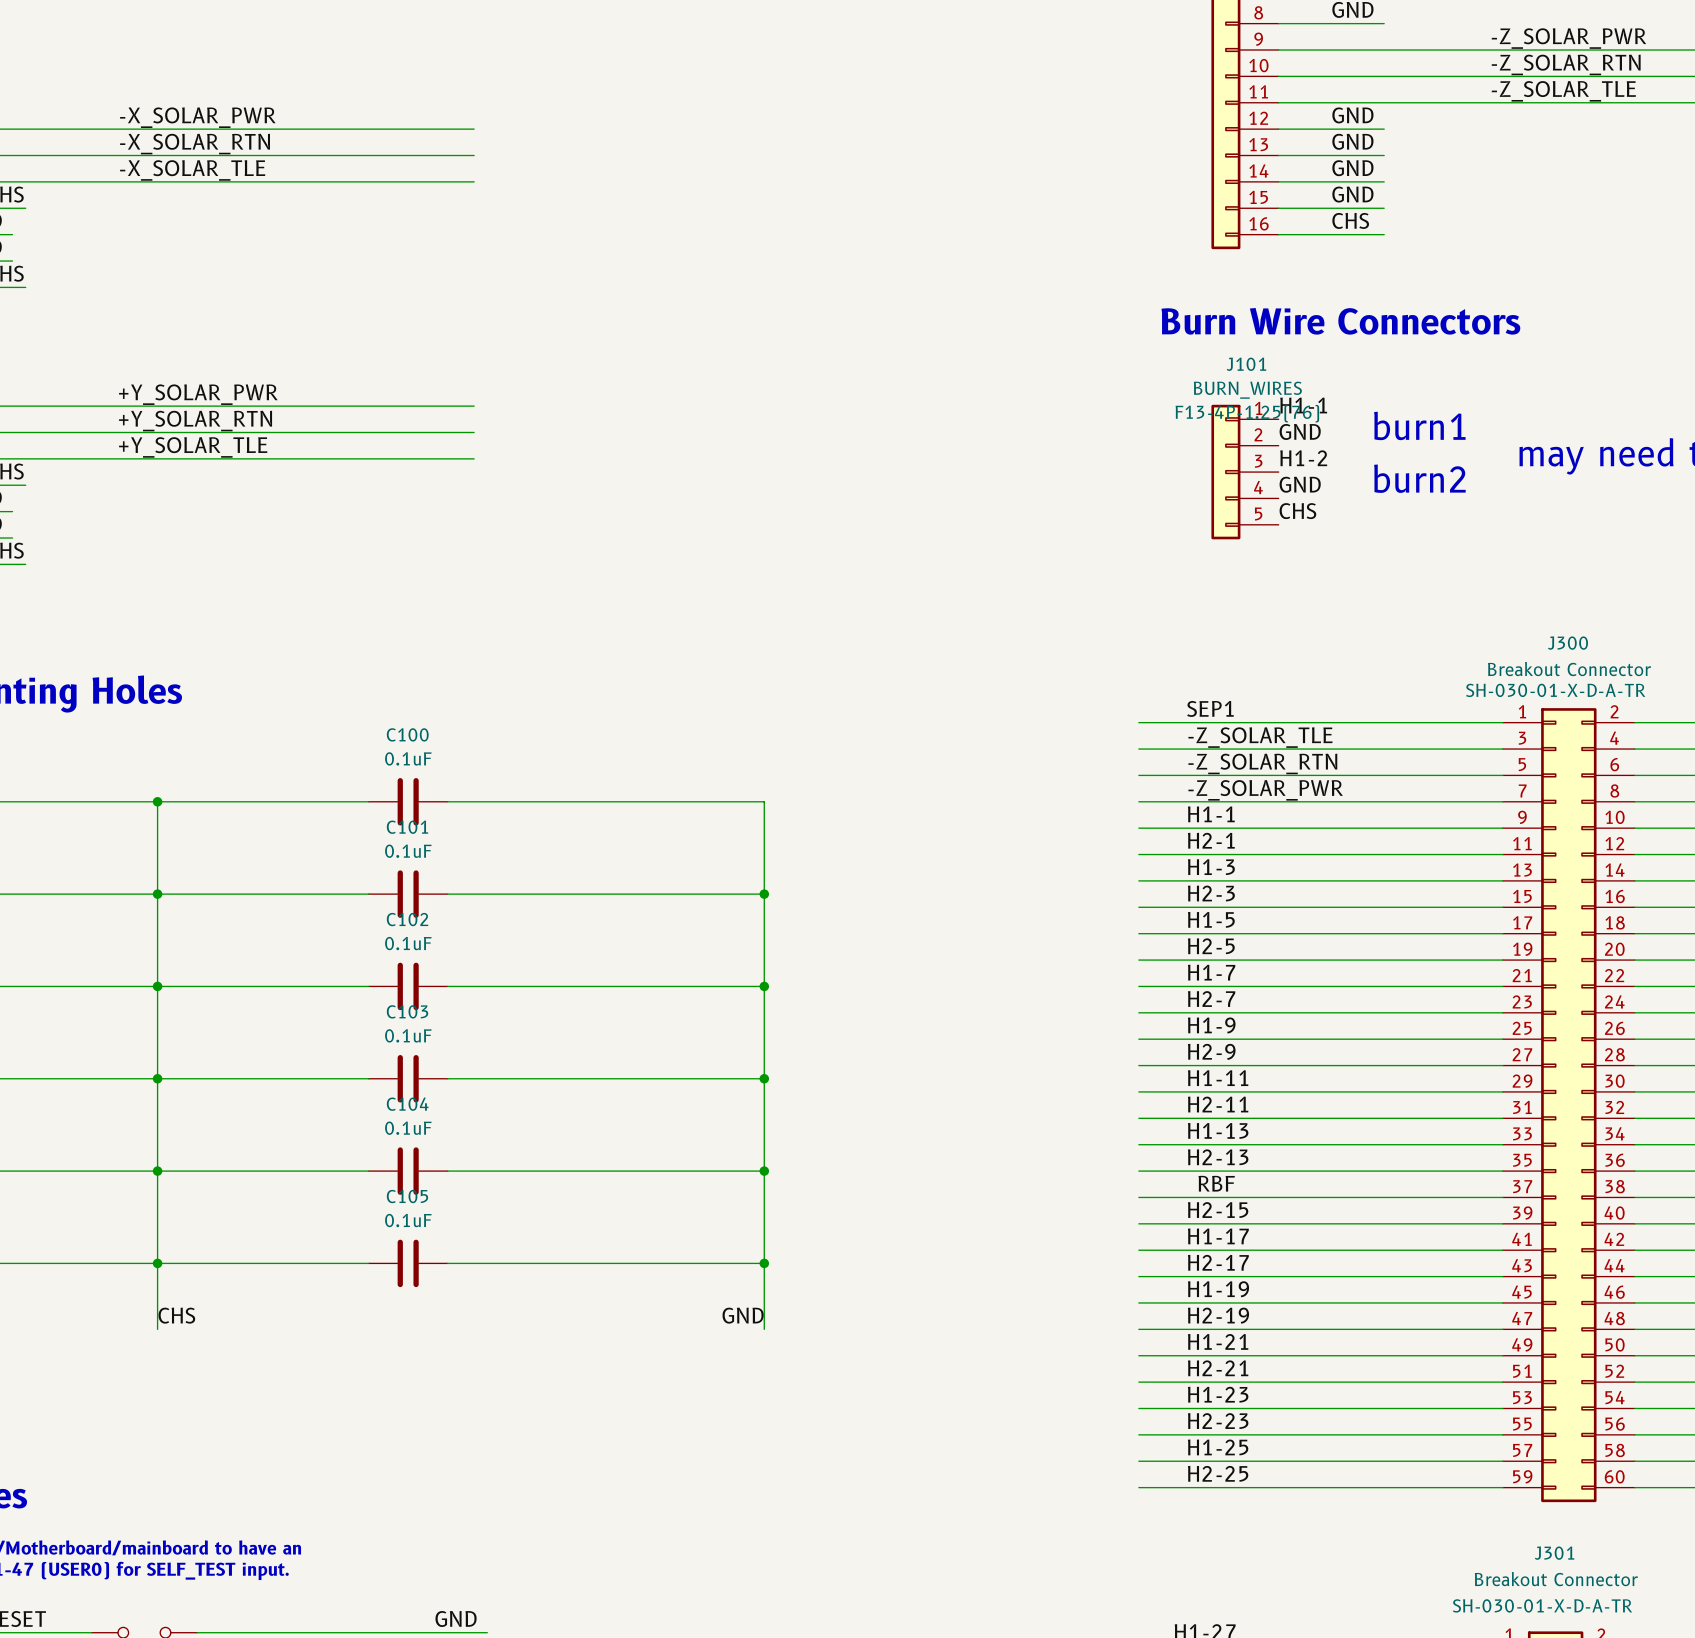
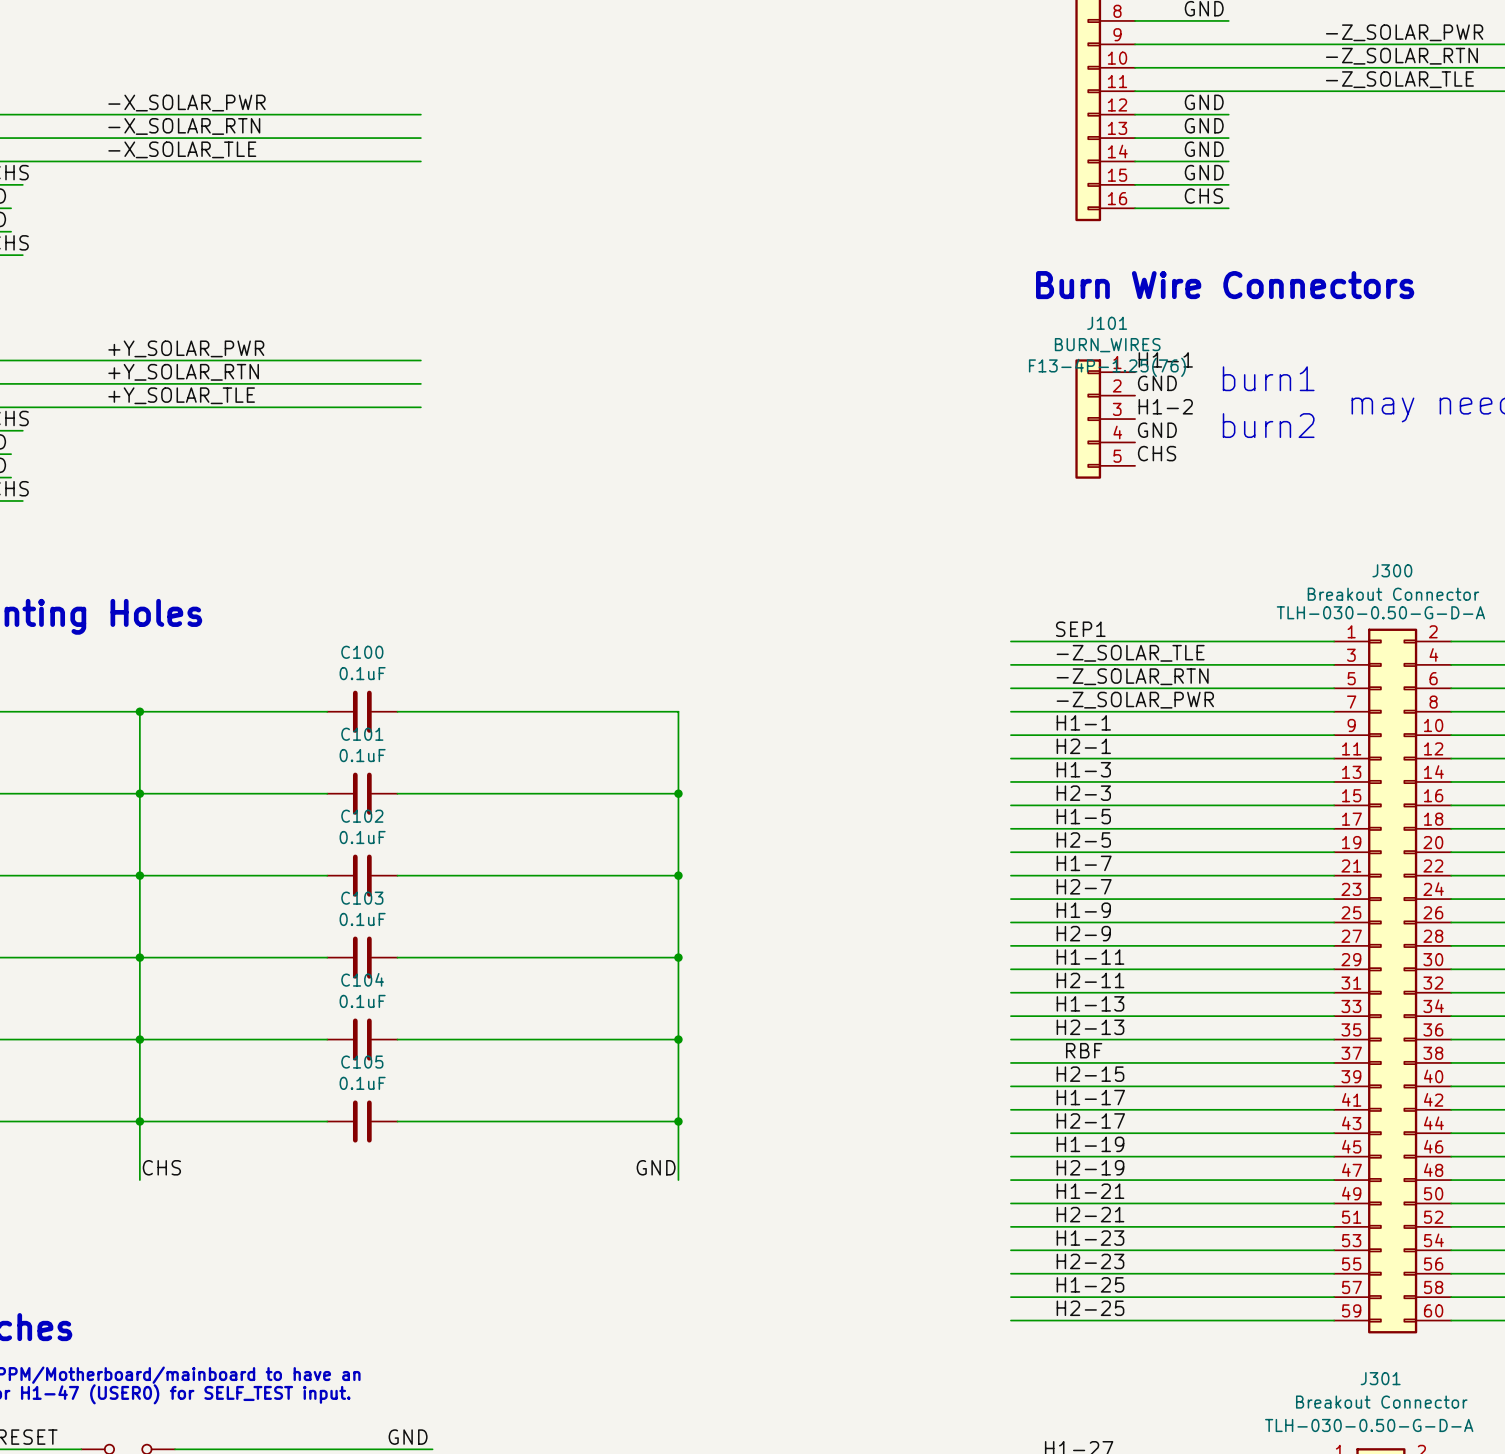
J300 text: SH-030-01-X-D-A-TR (1555, 690) -> TLH-030-0.50-G-D-A (1380, 612)
J301 text: SH-030-01-X-D-A-TR (1542, 1605) -> TLH-030-0.50-G-D-A (1369, 1425)

